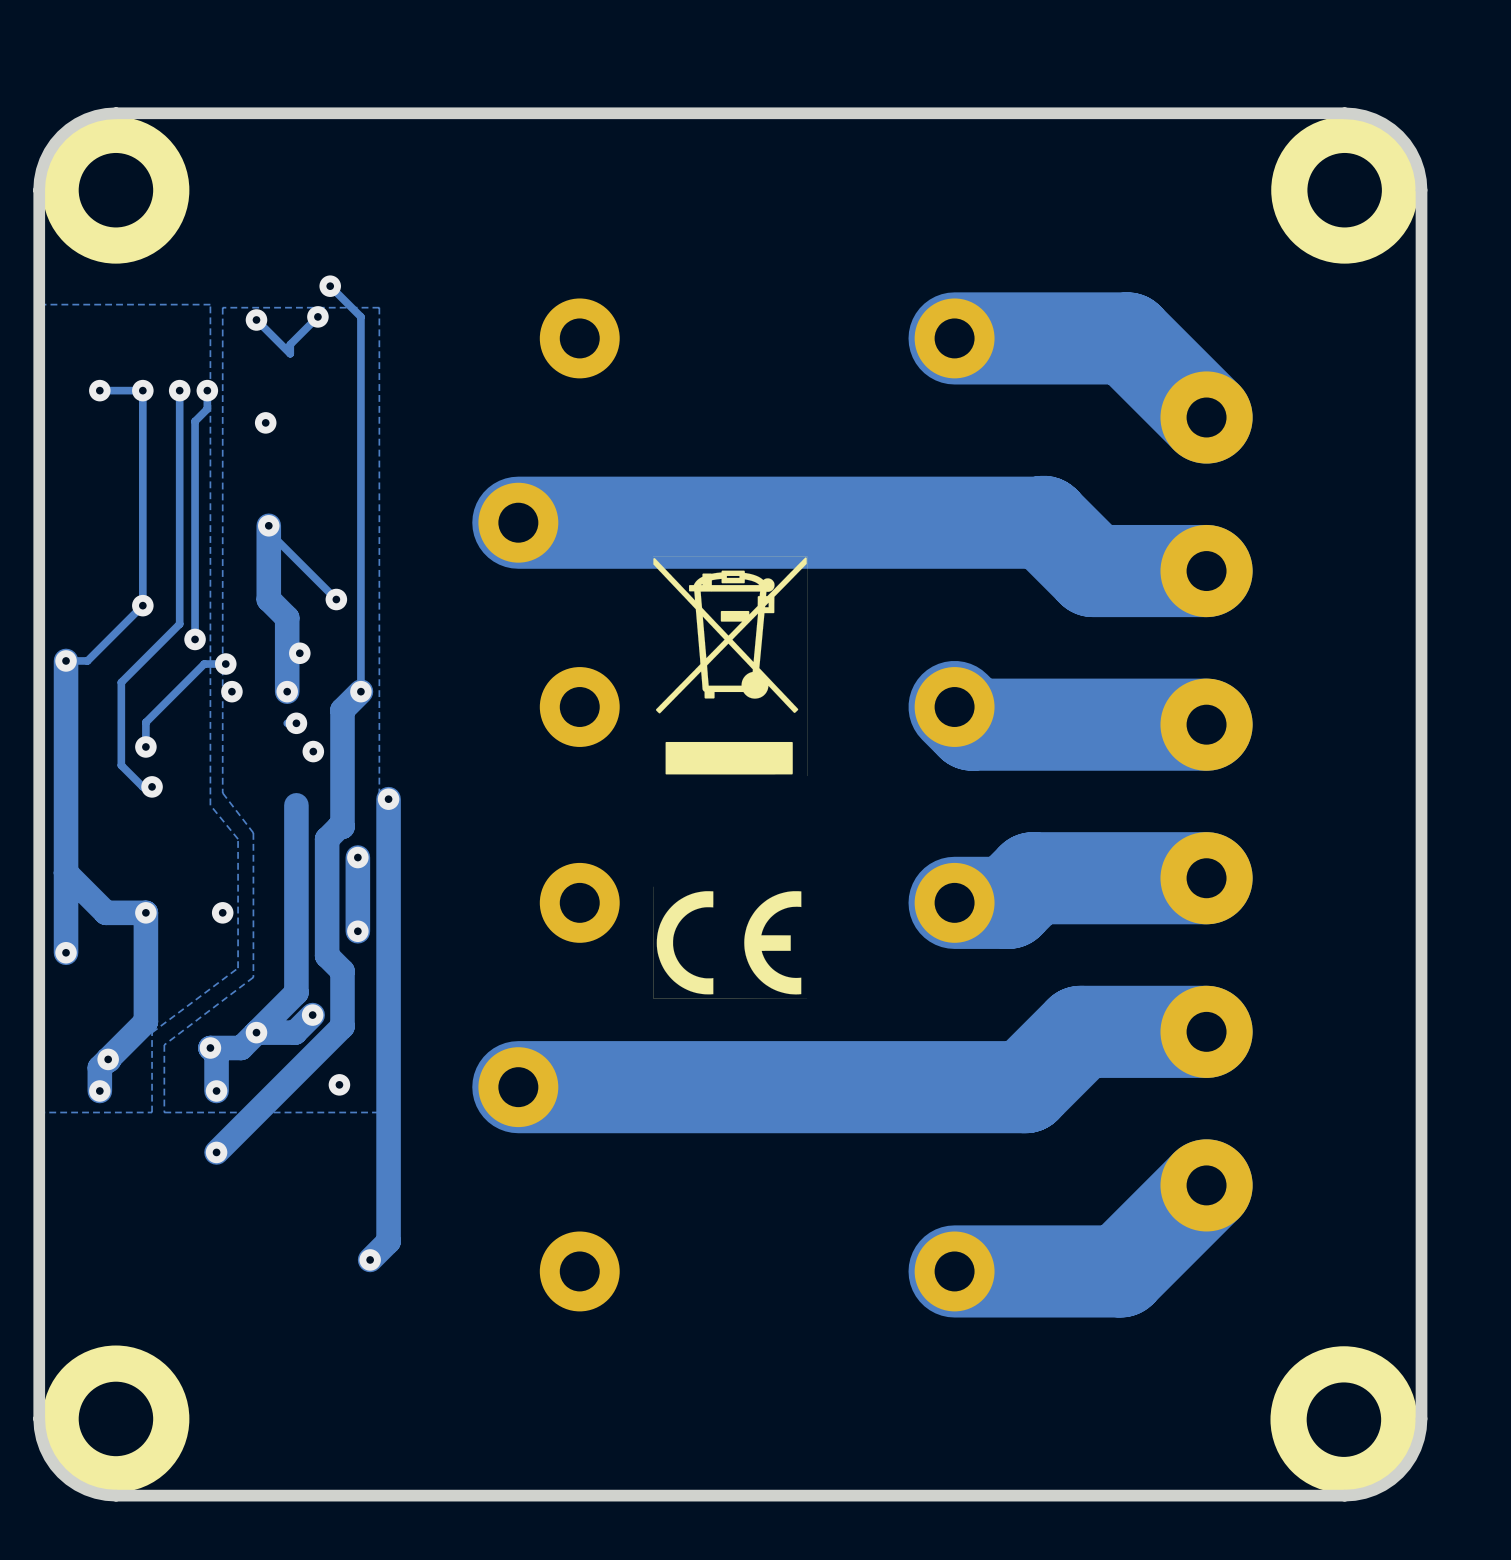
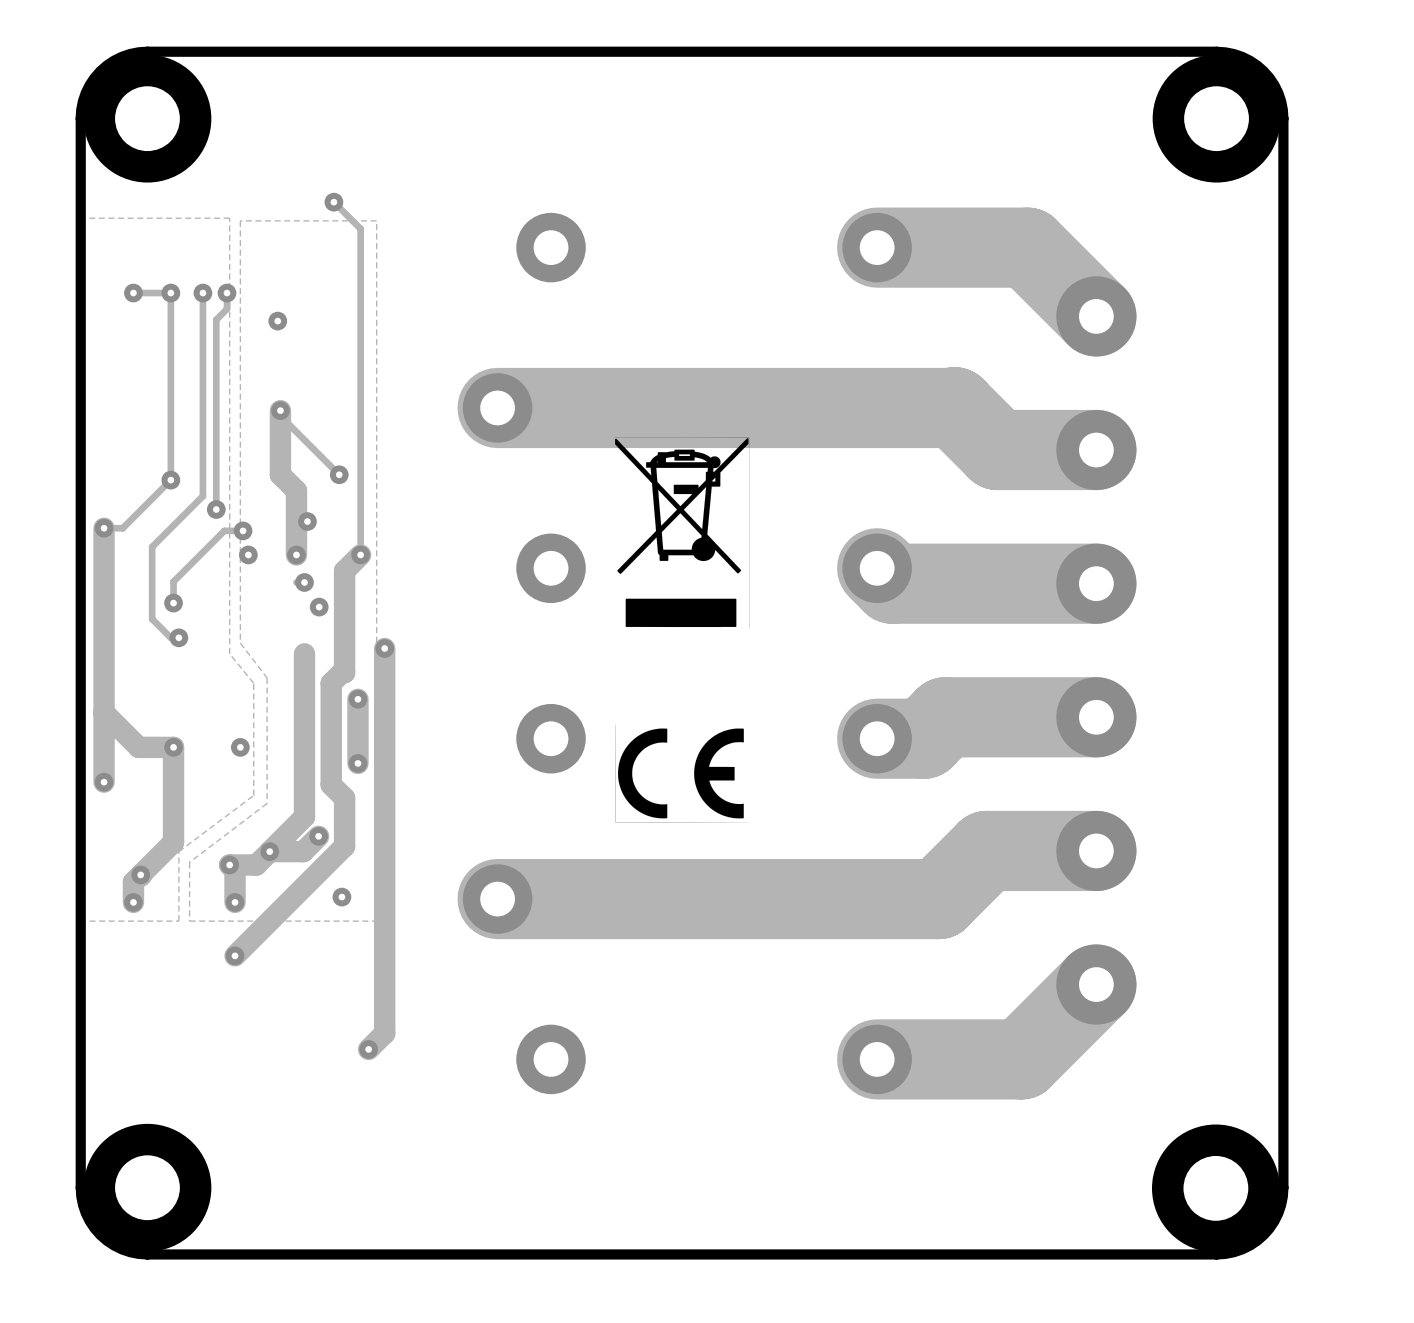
track: (317, 316) (290, 344) (290, 353) (256, 319) -> none
via: (317, 316) -> none
via: (256, 319) -> none

